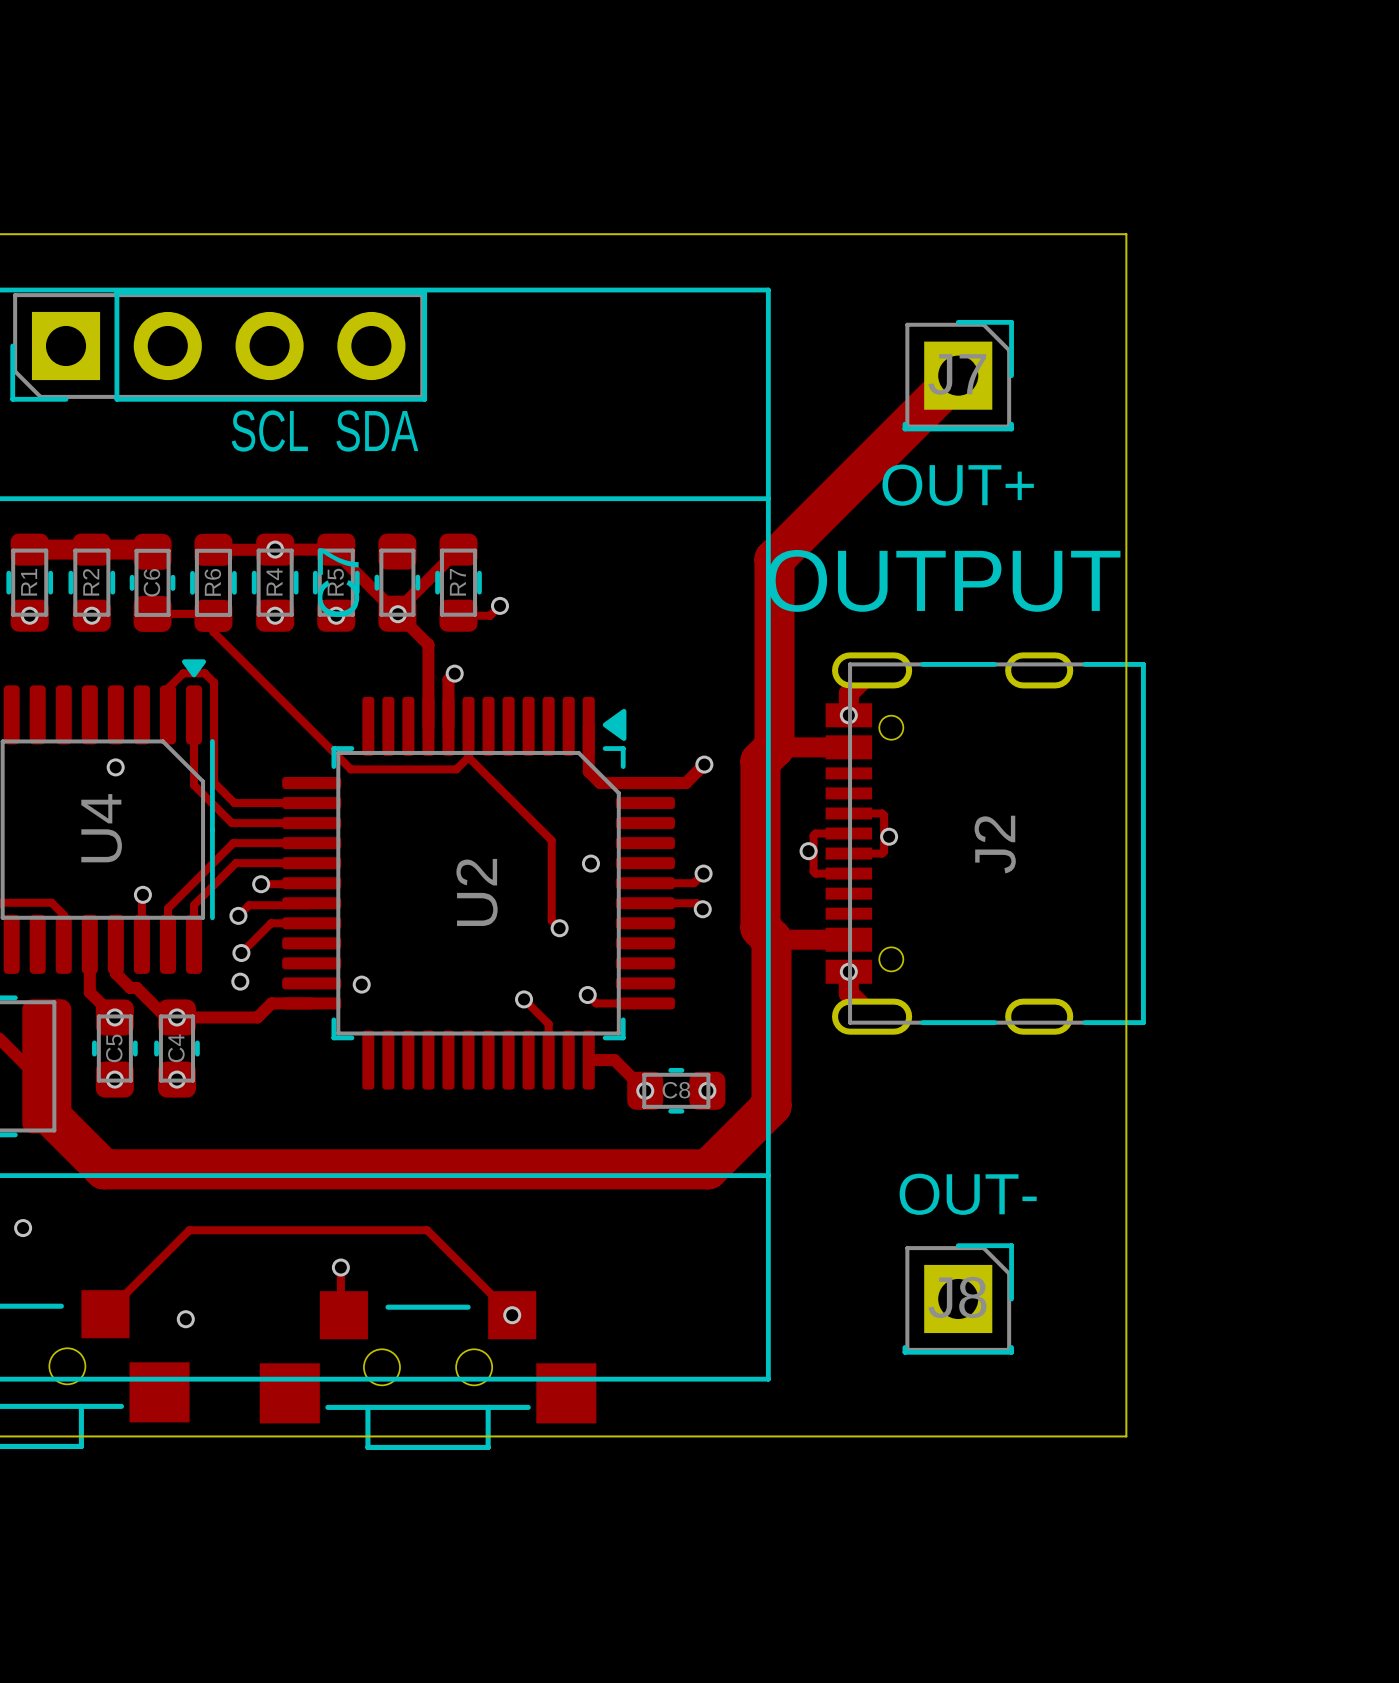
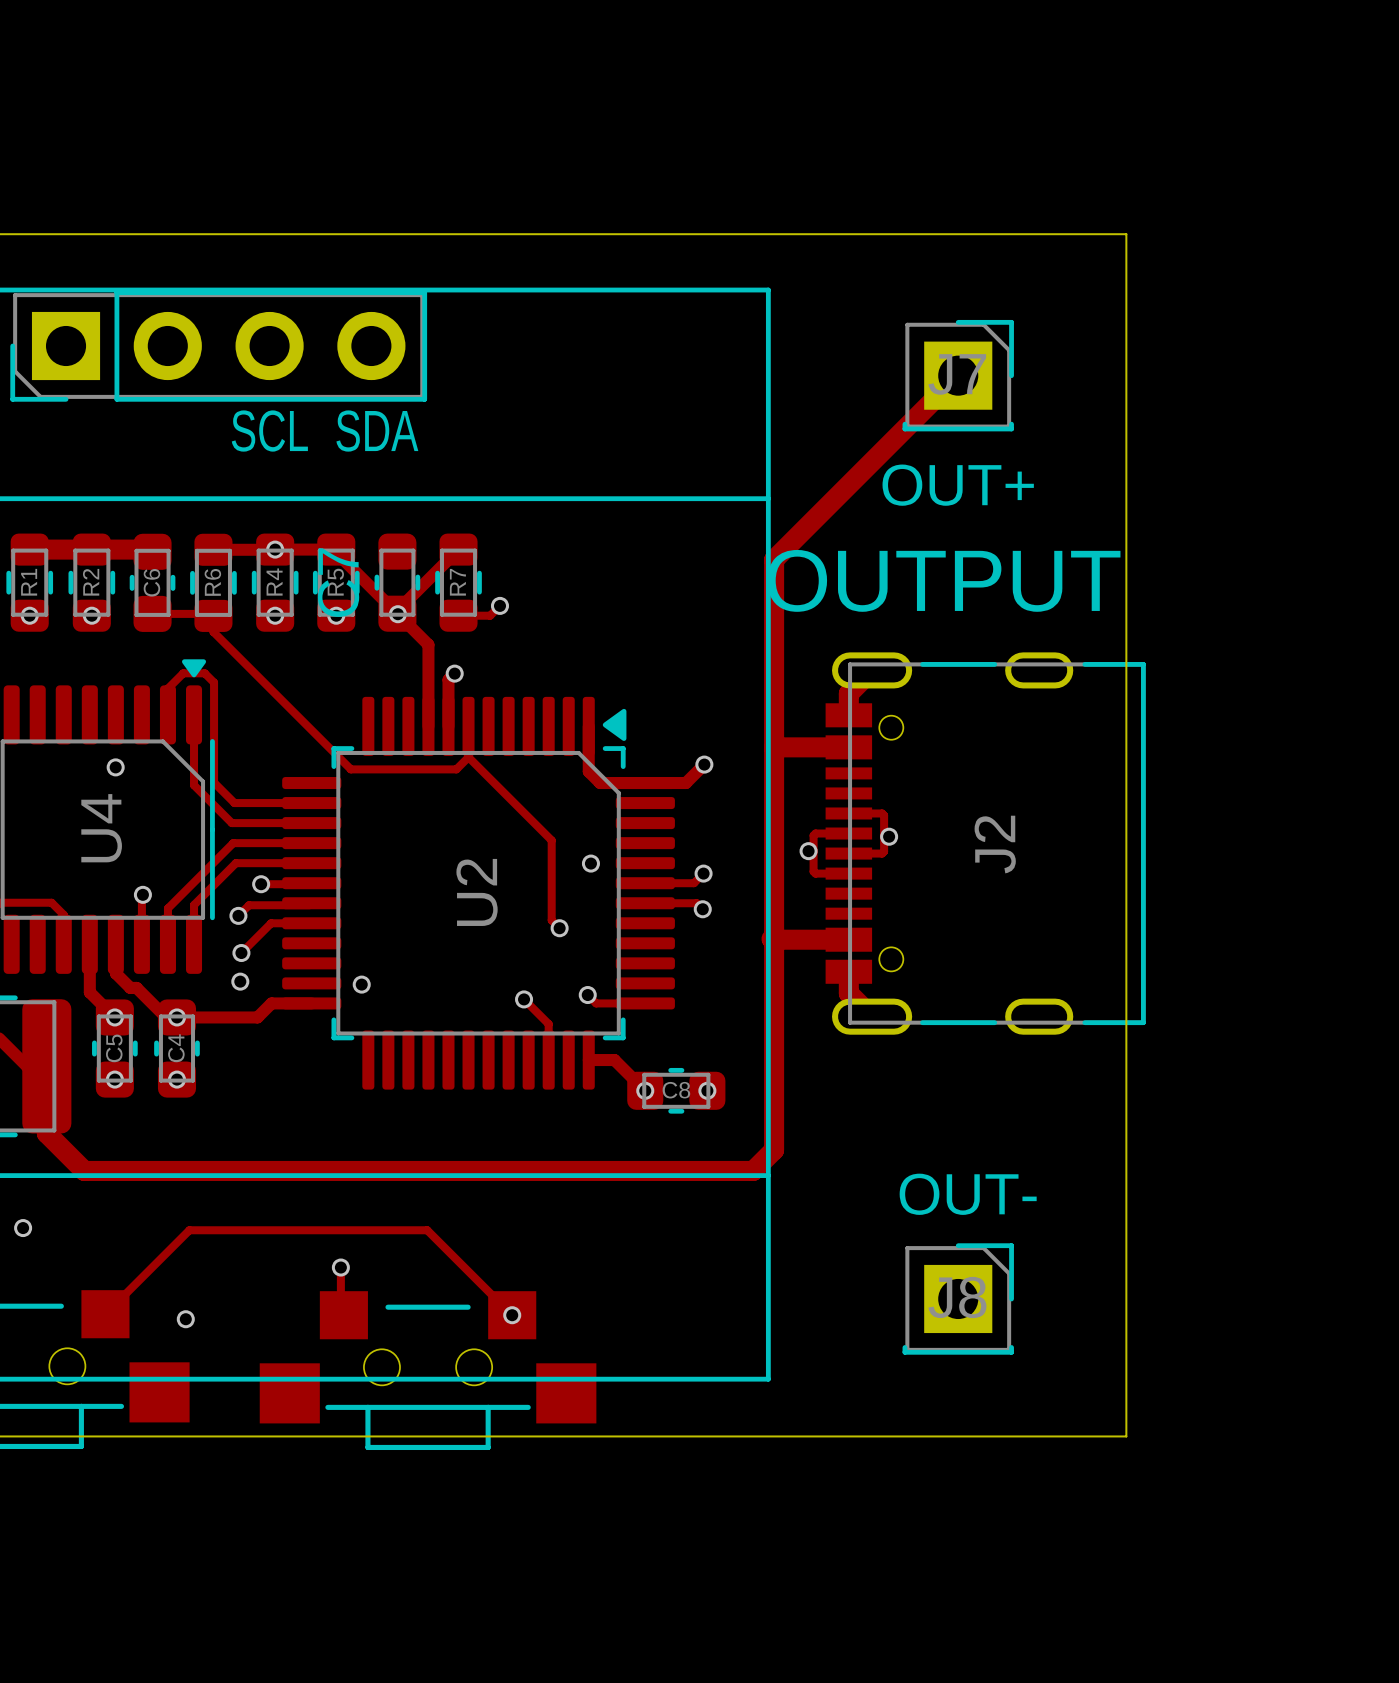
track width: thick (958, 375) (774, 559) -> thin (958, 375) (774, 559)
track: (774, 559) (774, 747) (760, 761) (760, 927) (771, 938) (771, 1105) (707, 1169) (104, 1169) (46, 1112) -> (774, 559) (774, 1150) (753, 1170) (84, 1170) (46, 1133) (46, 1112)
via: (848, 715) -> none
via: (848, 971) -> none

